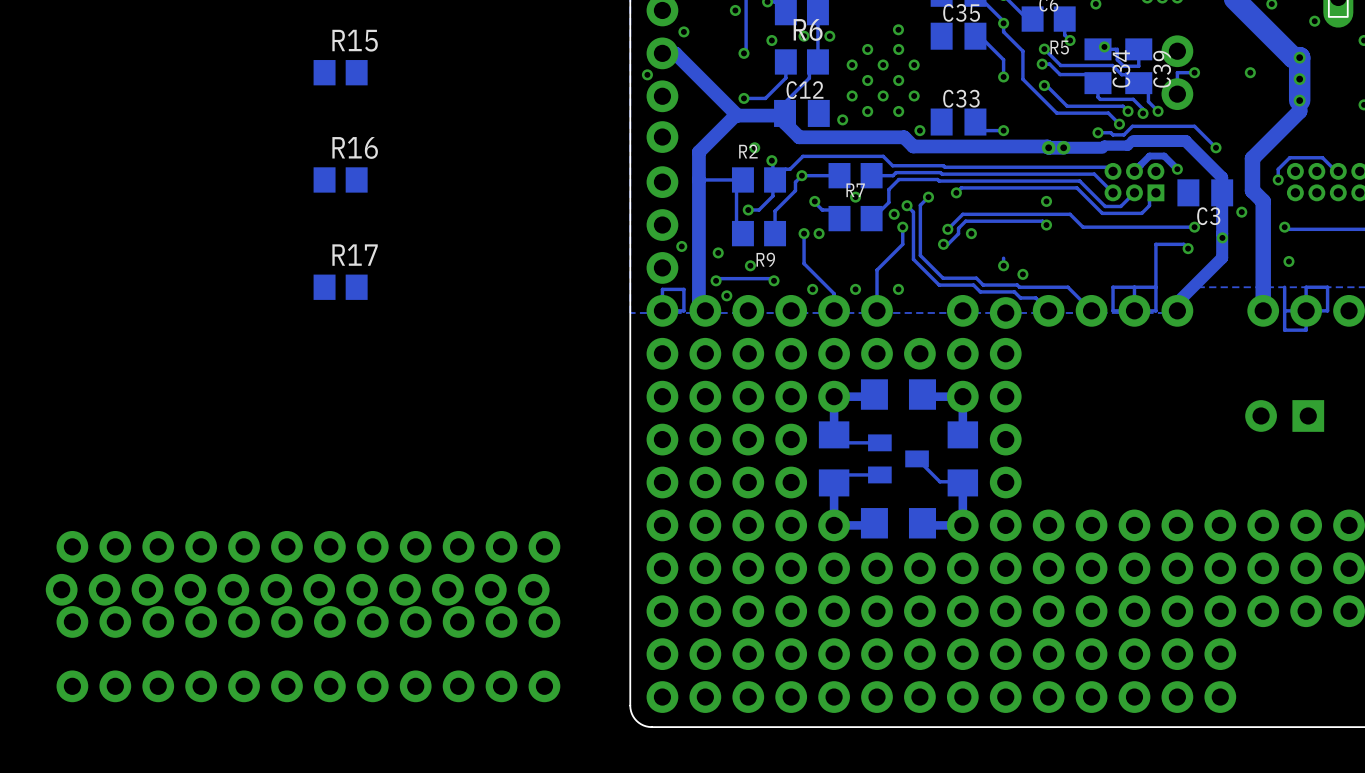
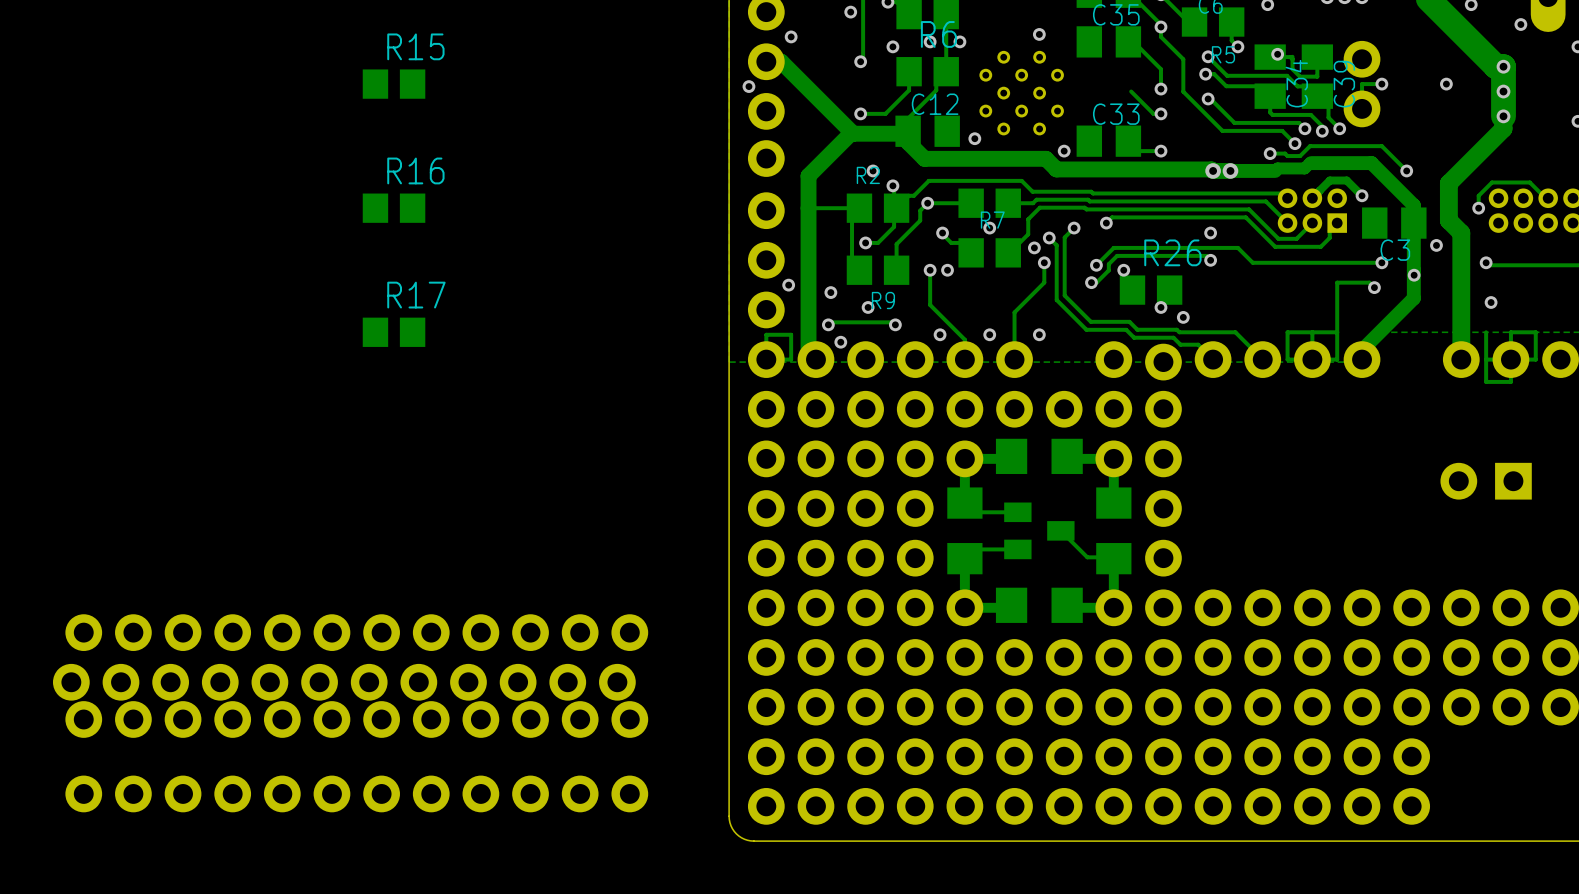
track: none -> (1131, 91) (1153, 113) (1160, 113)
via: none -> (1160, 113)
R26: none -> (1151, 290)

